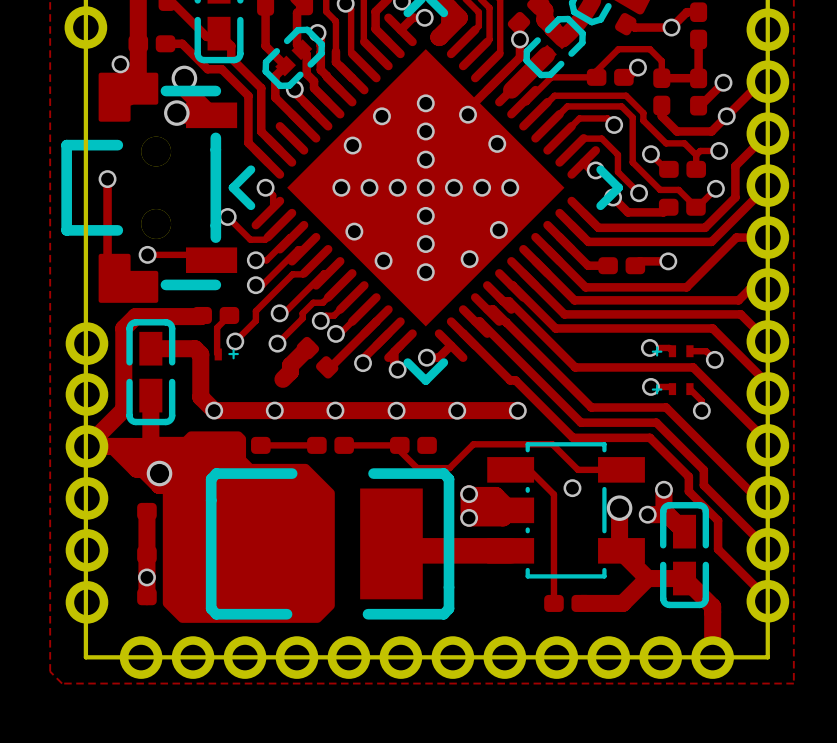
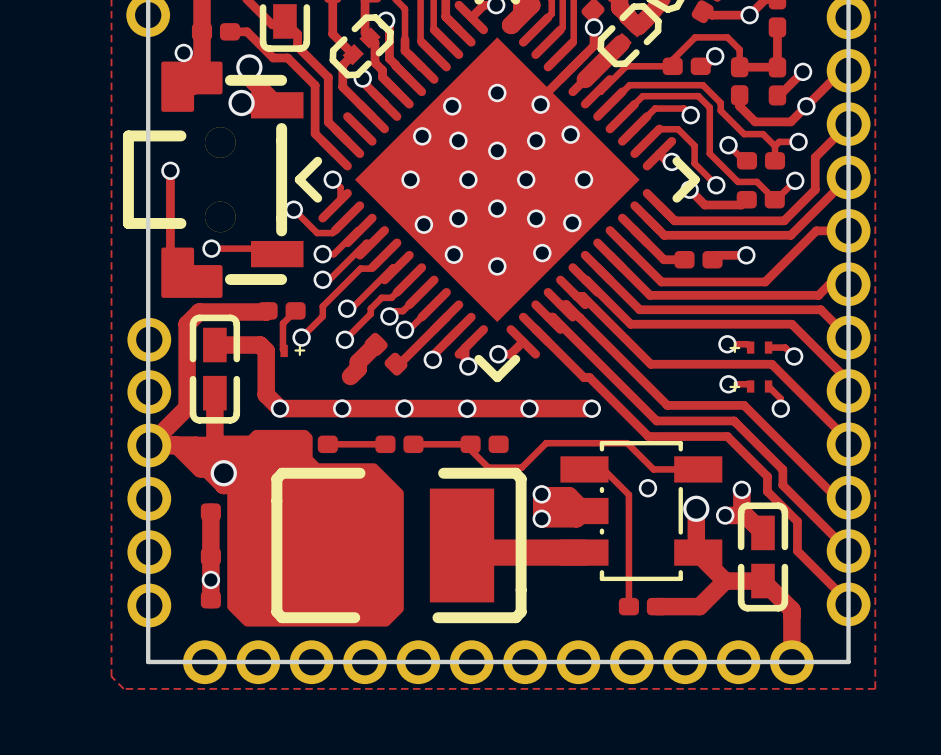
via: (425, 131) -> none
via: none -> (458, 140)
via: none -> (536, 140)
via: (369, 187) -> none
via: (425, 187) -> none
via: (482, 187) -> none
via: none -> (458, 218)
via: none -> (536, 218)
via: (425, 244) -> none

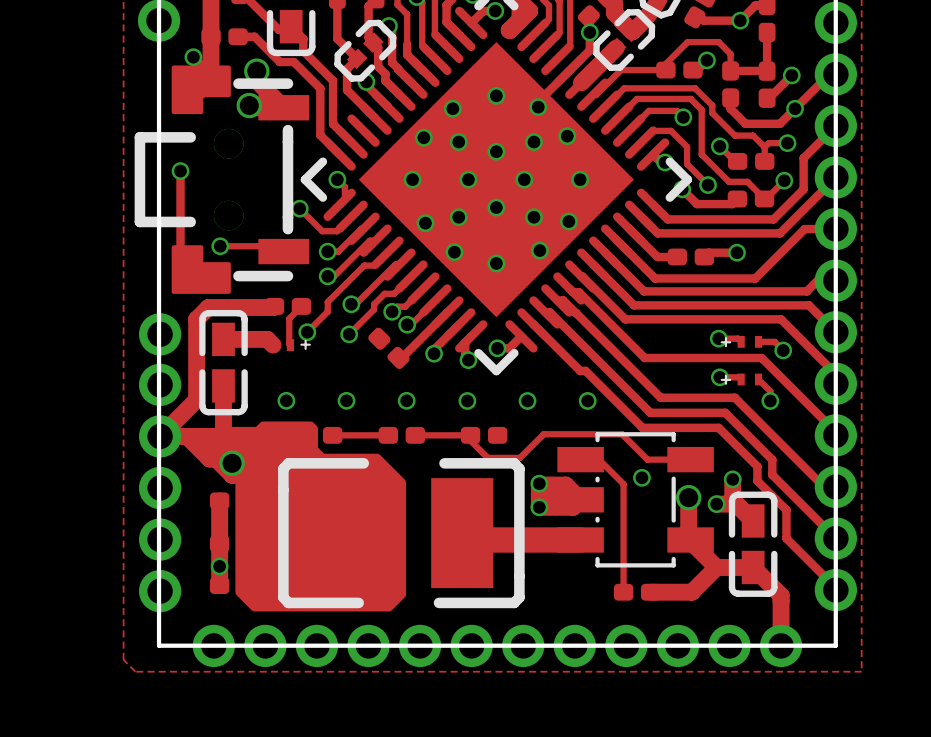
track: (376, 344) (358, 362) (358, 368) (350, 376) -> none
track: (266, 350) (266, 394) (279, 408) (591, 408) -> none

